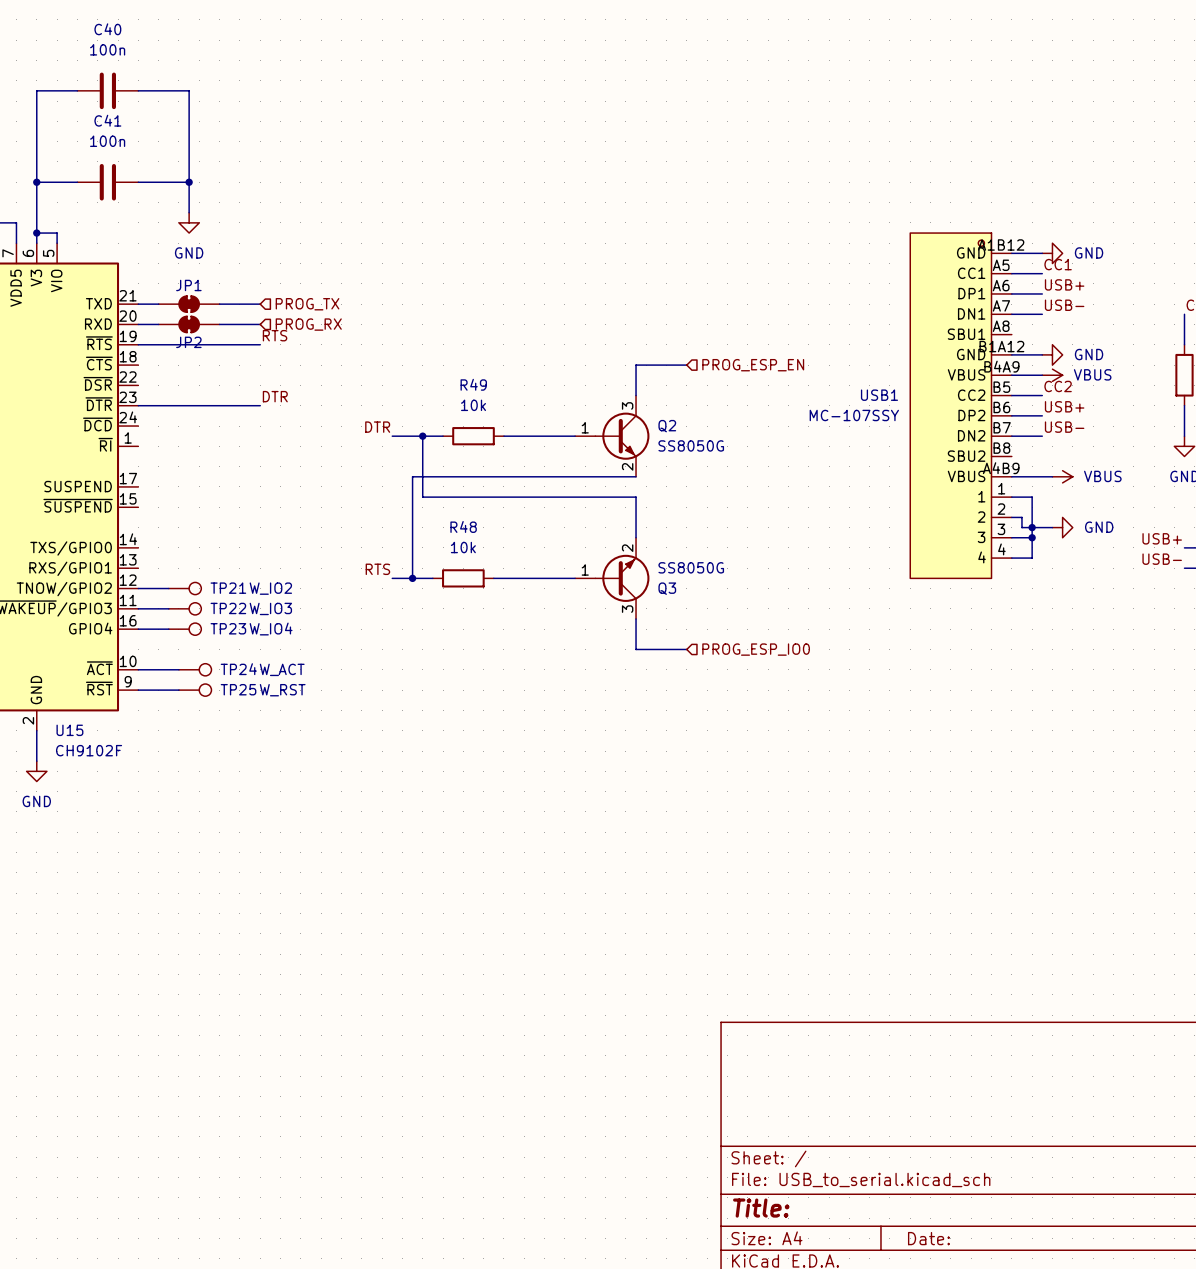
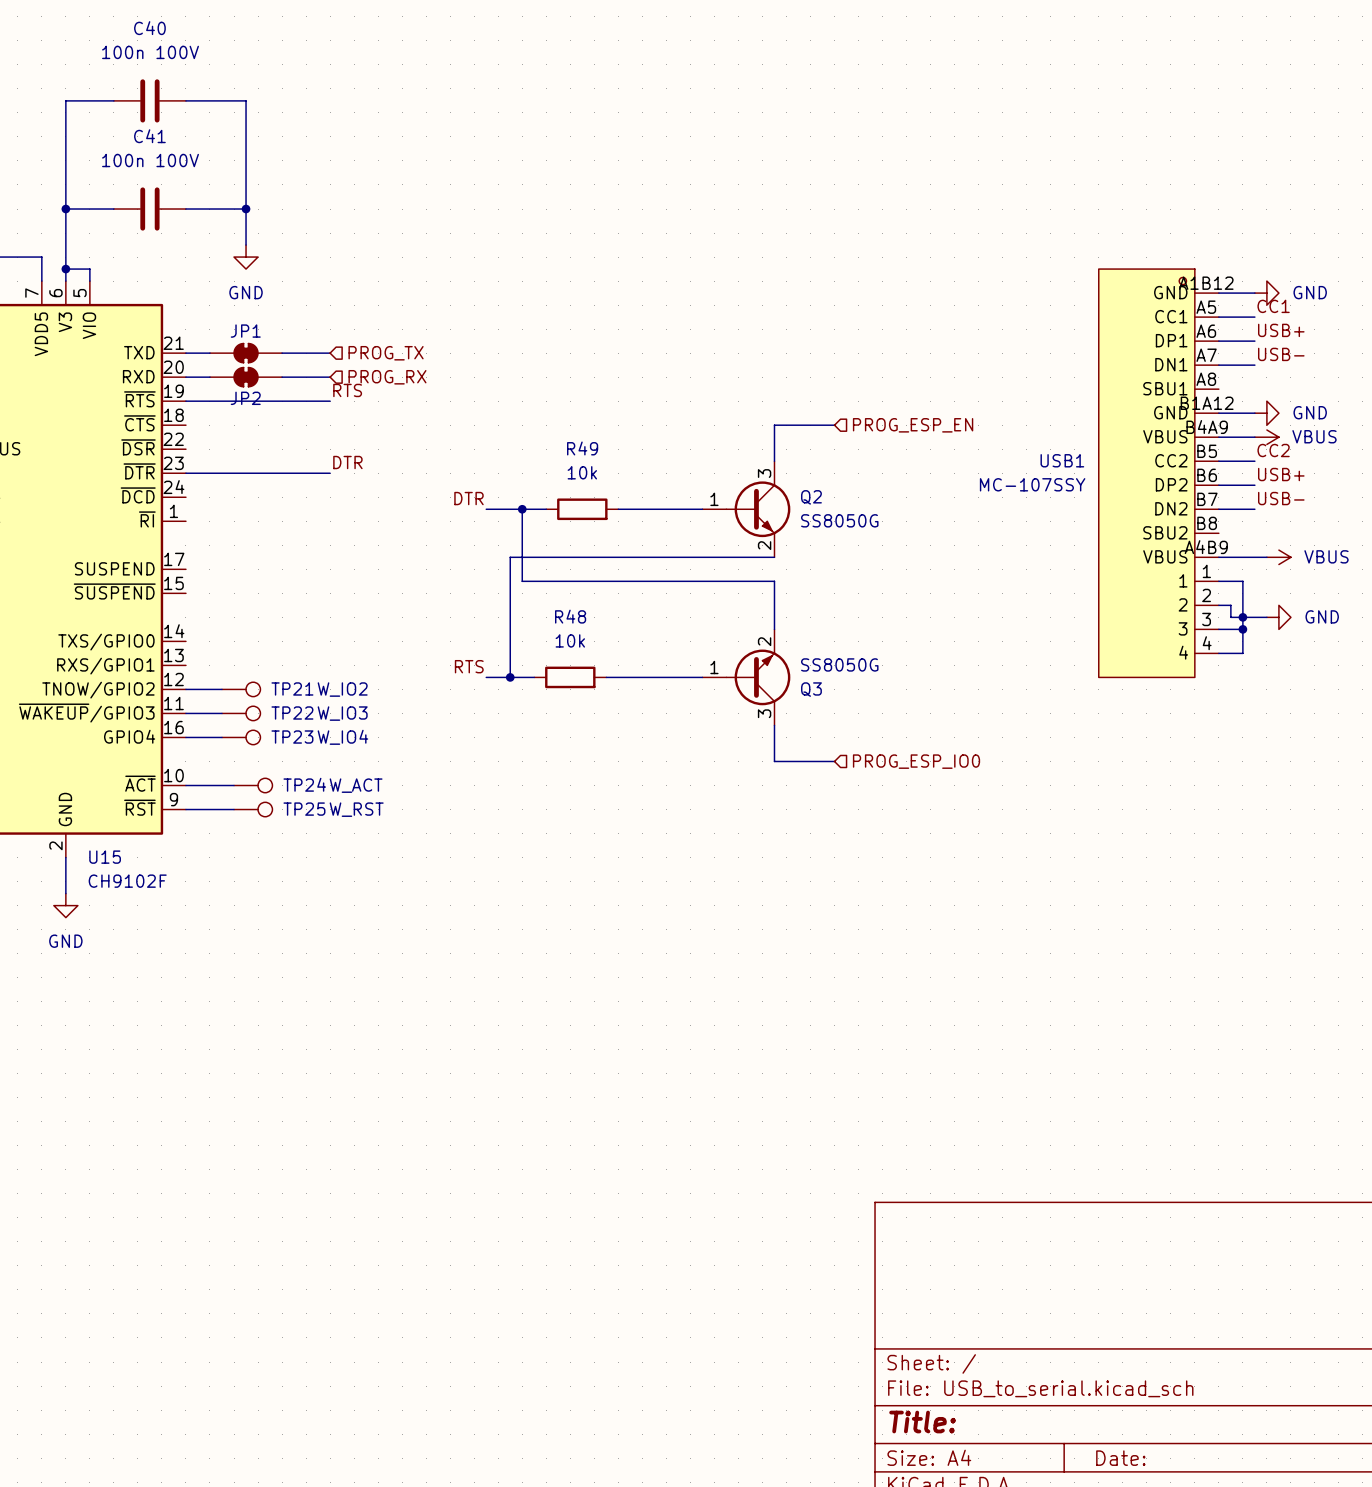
C40 value: 100n (107, 49) -> 100n 100V (150, 52)
C41 value: 100n (107, 141) -> 100n 100V (150, 160)

